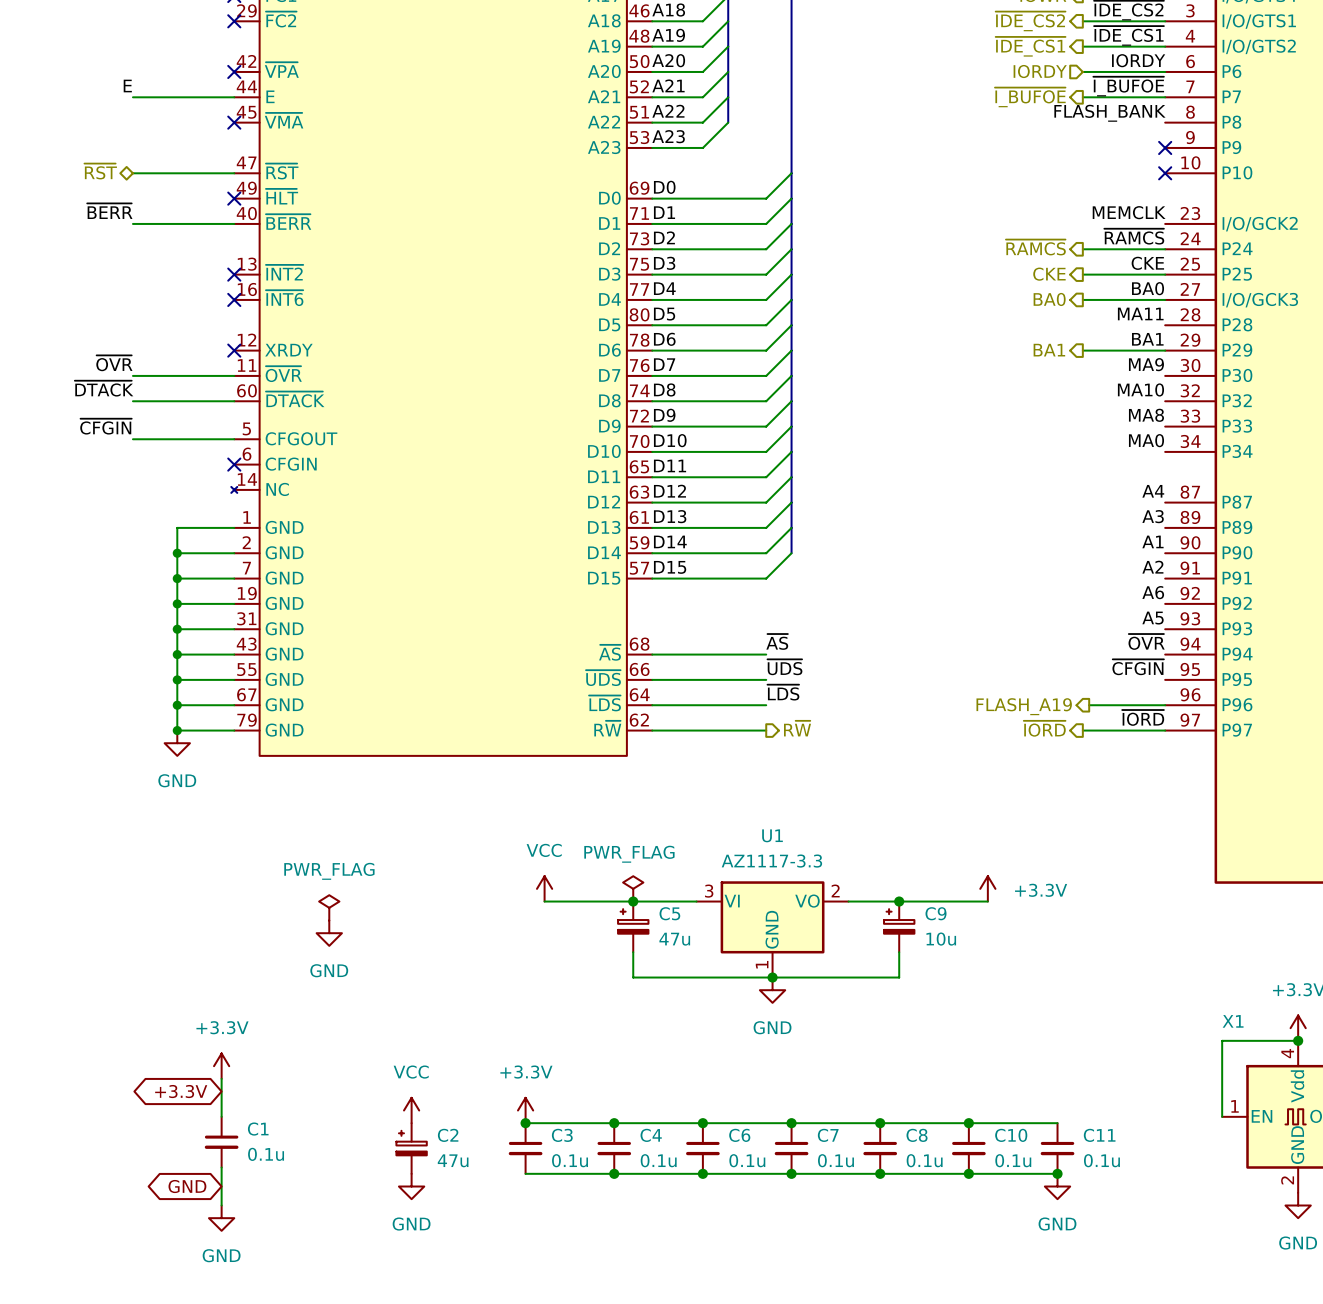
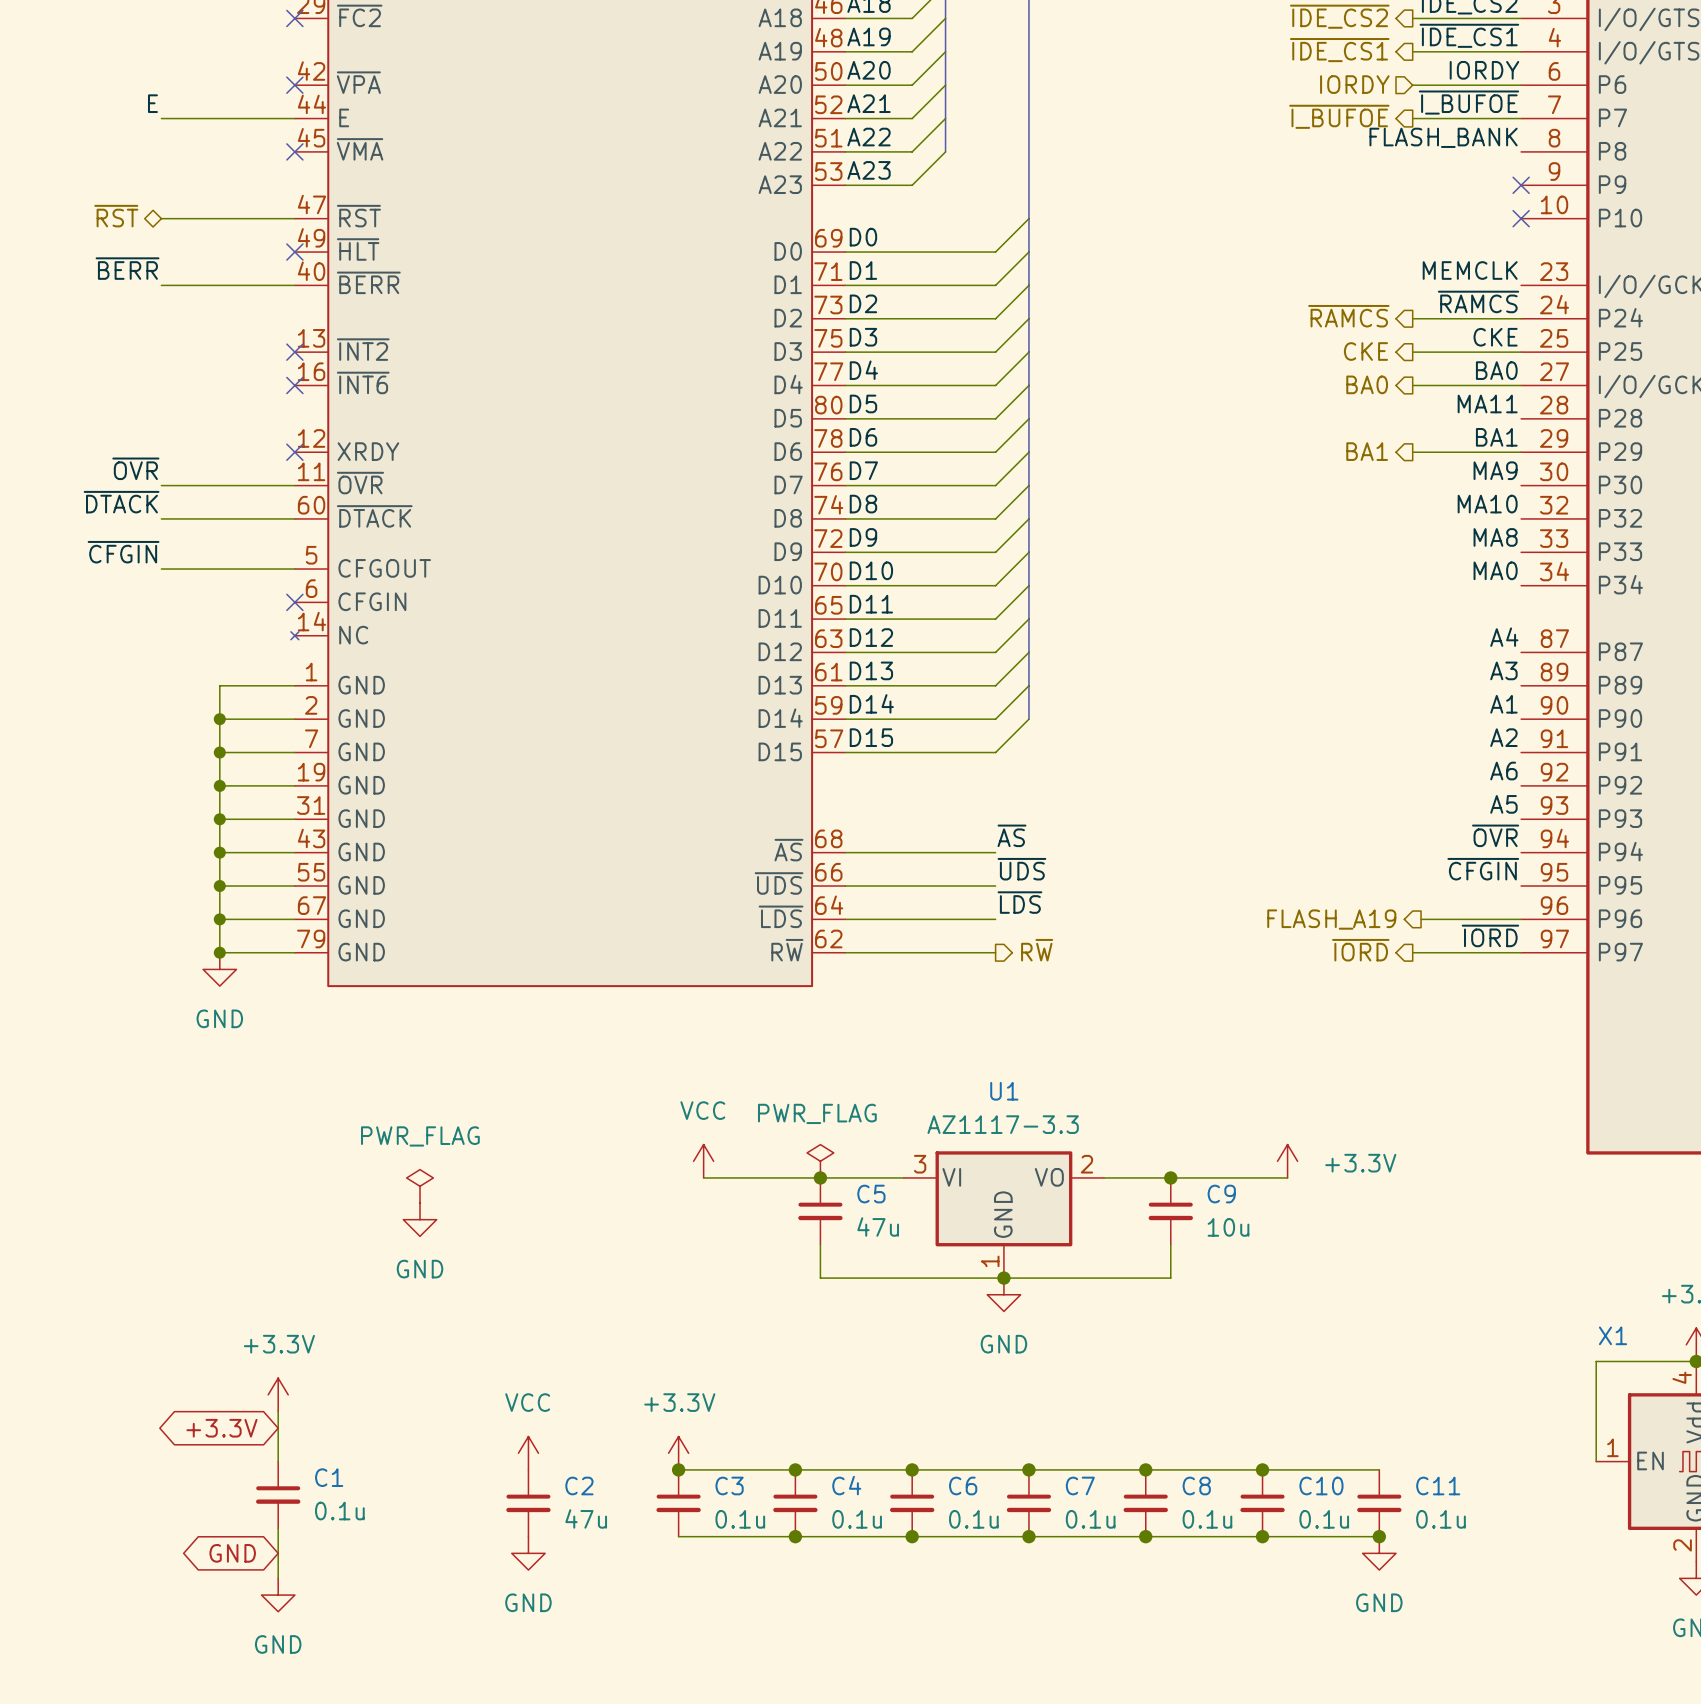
C5 symbol: [618, 901, 649, 953] -> [798, 1177, 843, 1245]
C9 symbol: [884, 901, 915, 953] -> [1148, 1177, 1193, 1245]
C2 symbol: [396, 1123, 427, 1174] -> [506, 1469, 551, 1537]

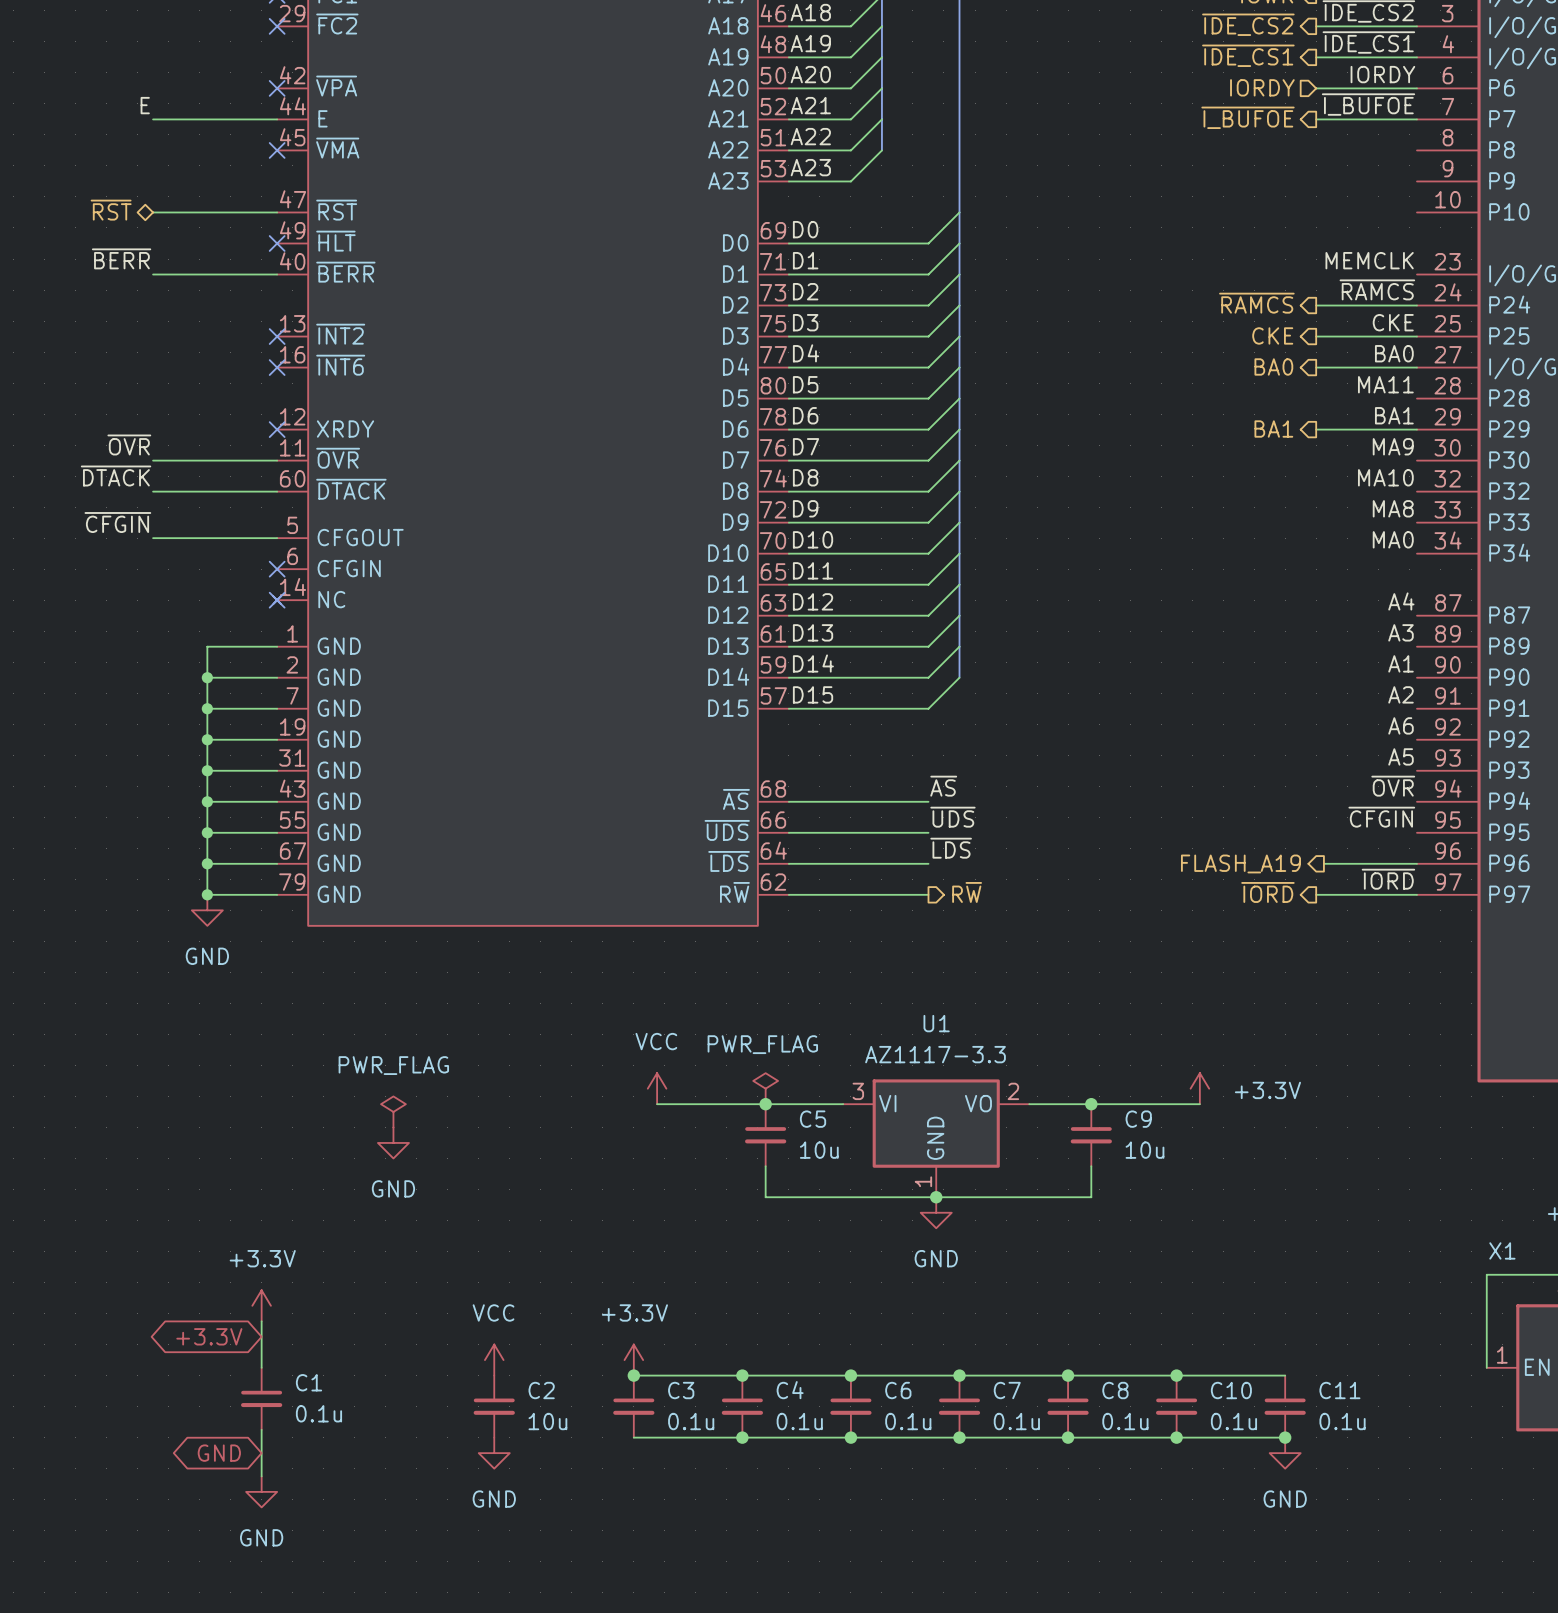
label: FLASH_BANK (1443, 137) -> none
no-connect mark: (1521, 185) -> none
no-connect mark: (1521, 218) -> none
no-connect mark: none -> (277, 600)
C5 value: 47u (878, 1227) -> 10u (819, 1150)
C2 value: 47u (586, 1518) -> 10u (547, 1421)

